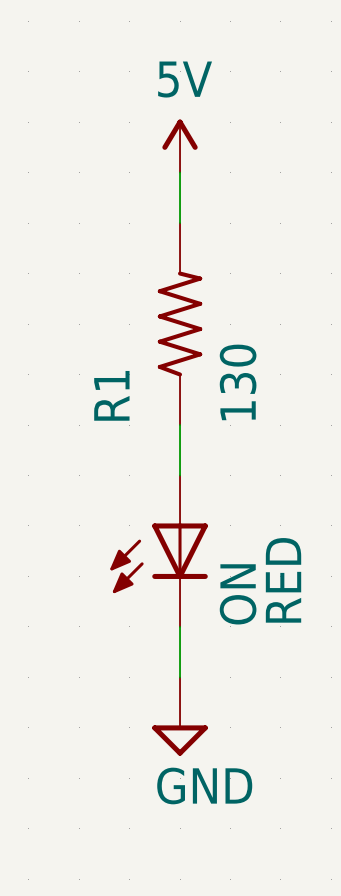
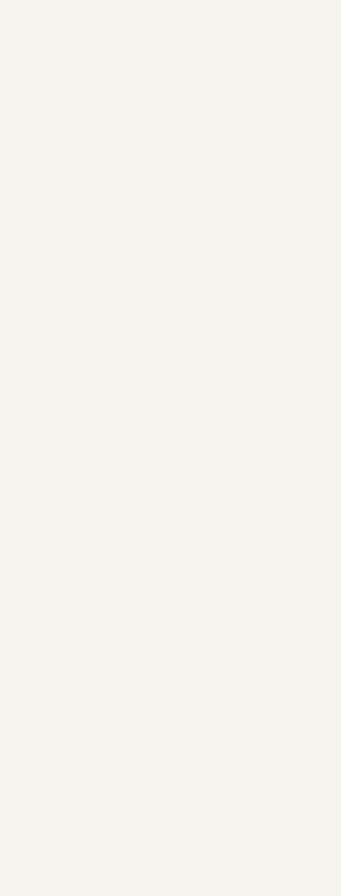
power symbol: 5V (180, 146) -> none
wire: (180, 172) (180, 223) -> none
R1: 130 (180, 324) -> none
wire: (180, 425) (180, 475) -> none
ON: RED (159, 551) -> none
wire: (180, 626) (180, 677) -> none
power symbol: GND (180, 716) -> none

